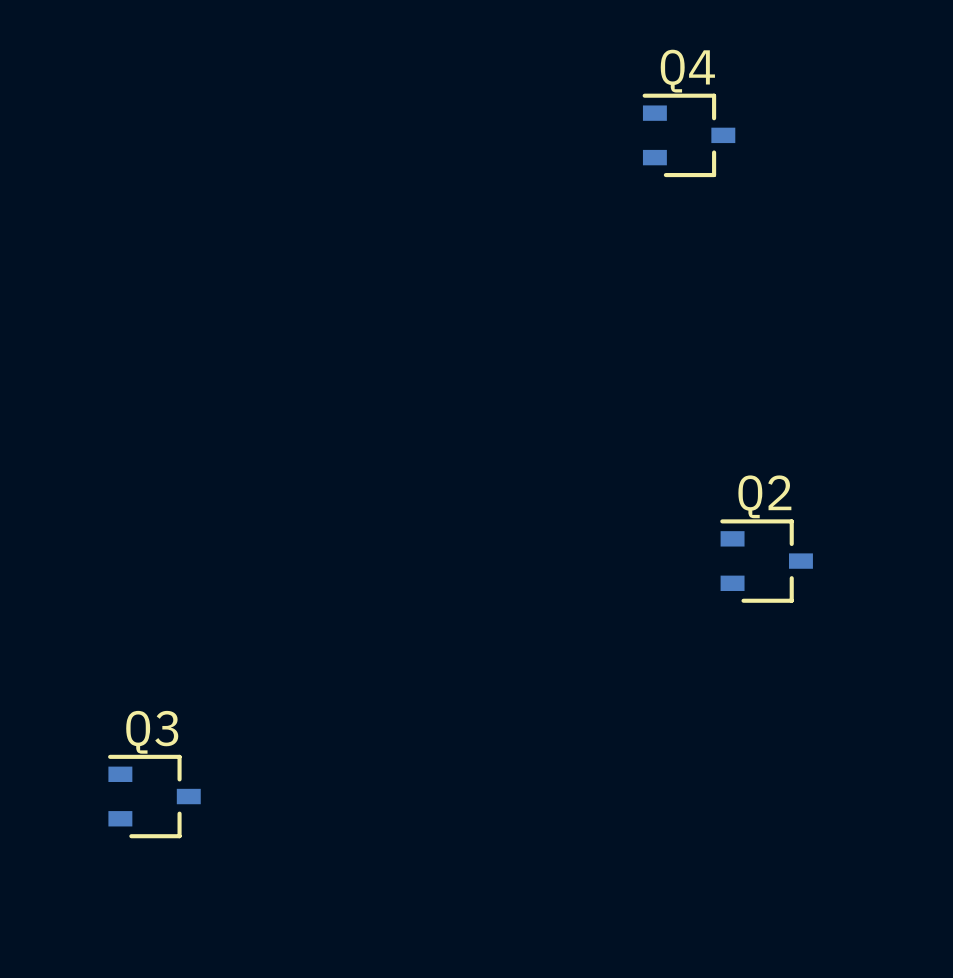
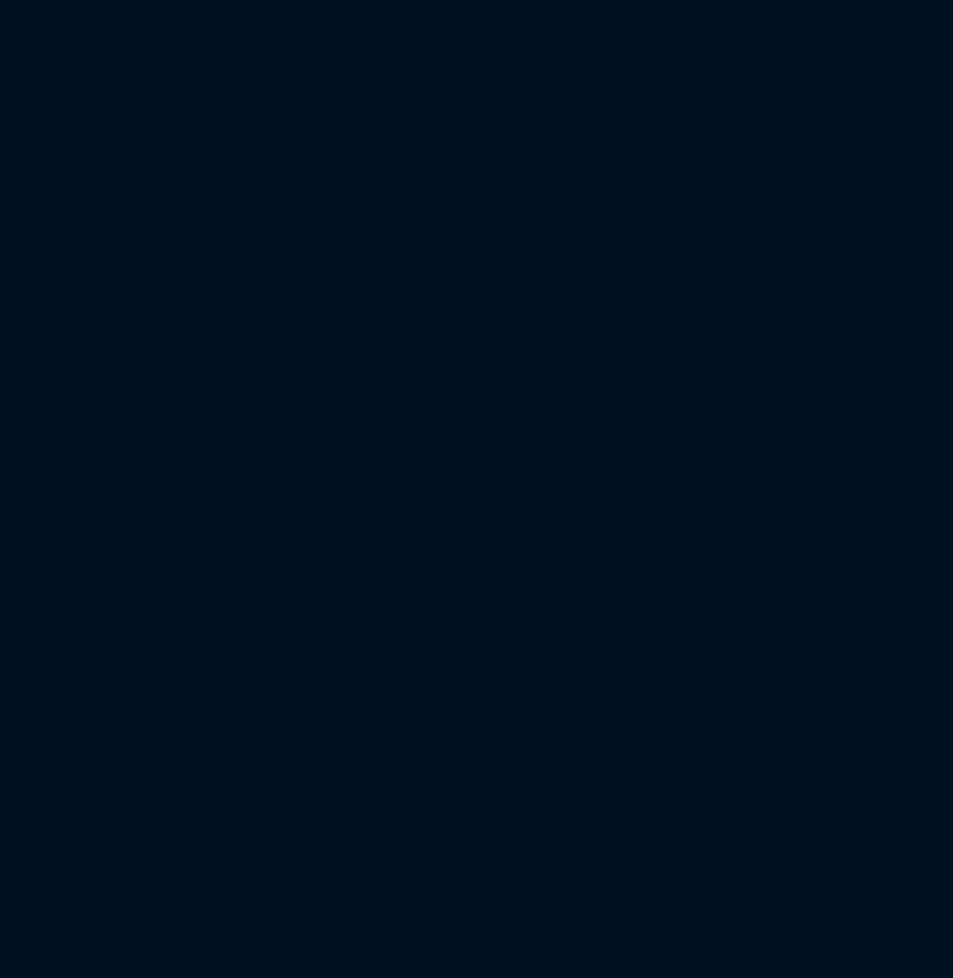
Q4: (688, 135) -> none
Q2: (766, 561) -> none
Q3: (154, 796) -> none

